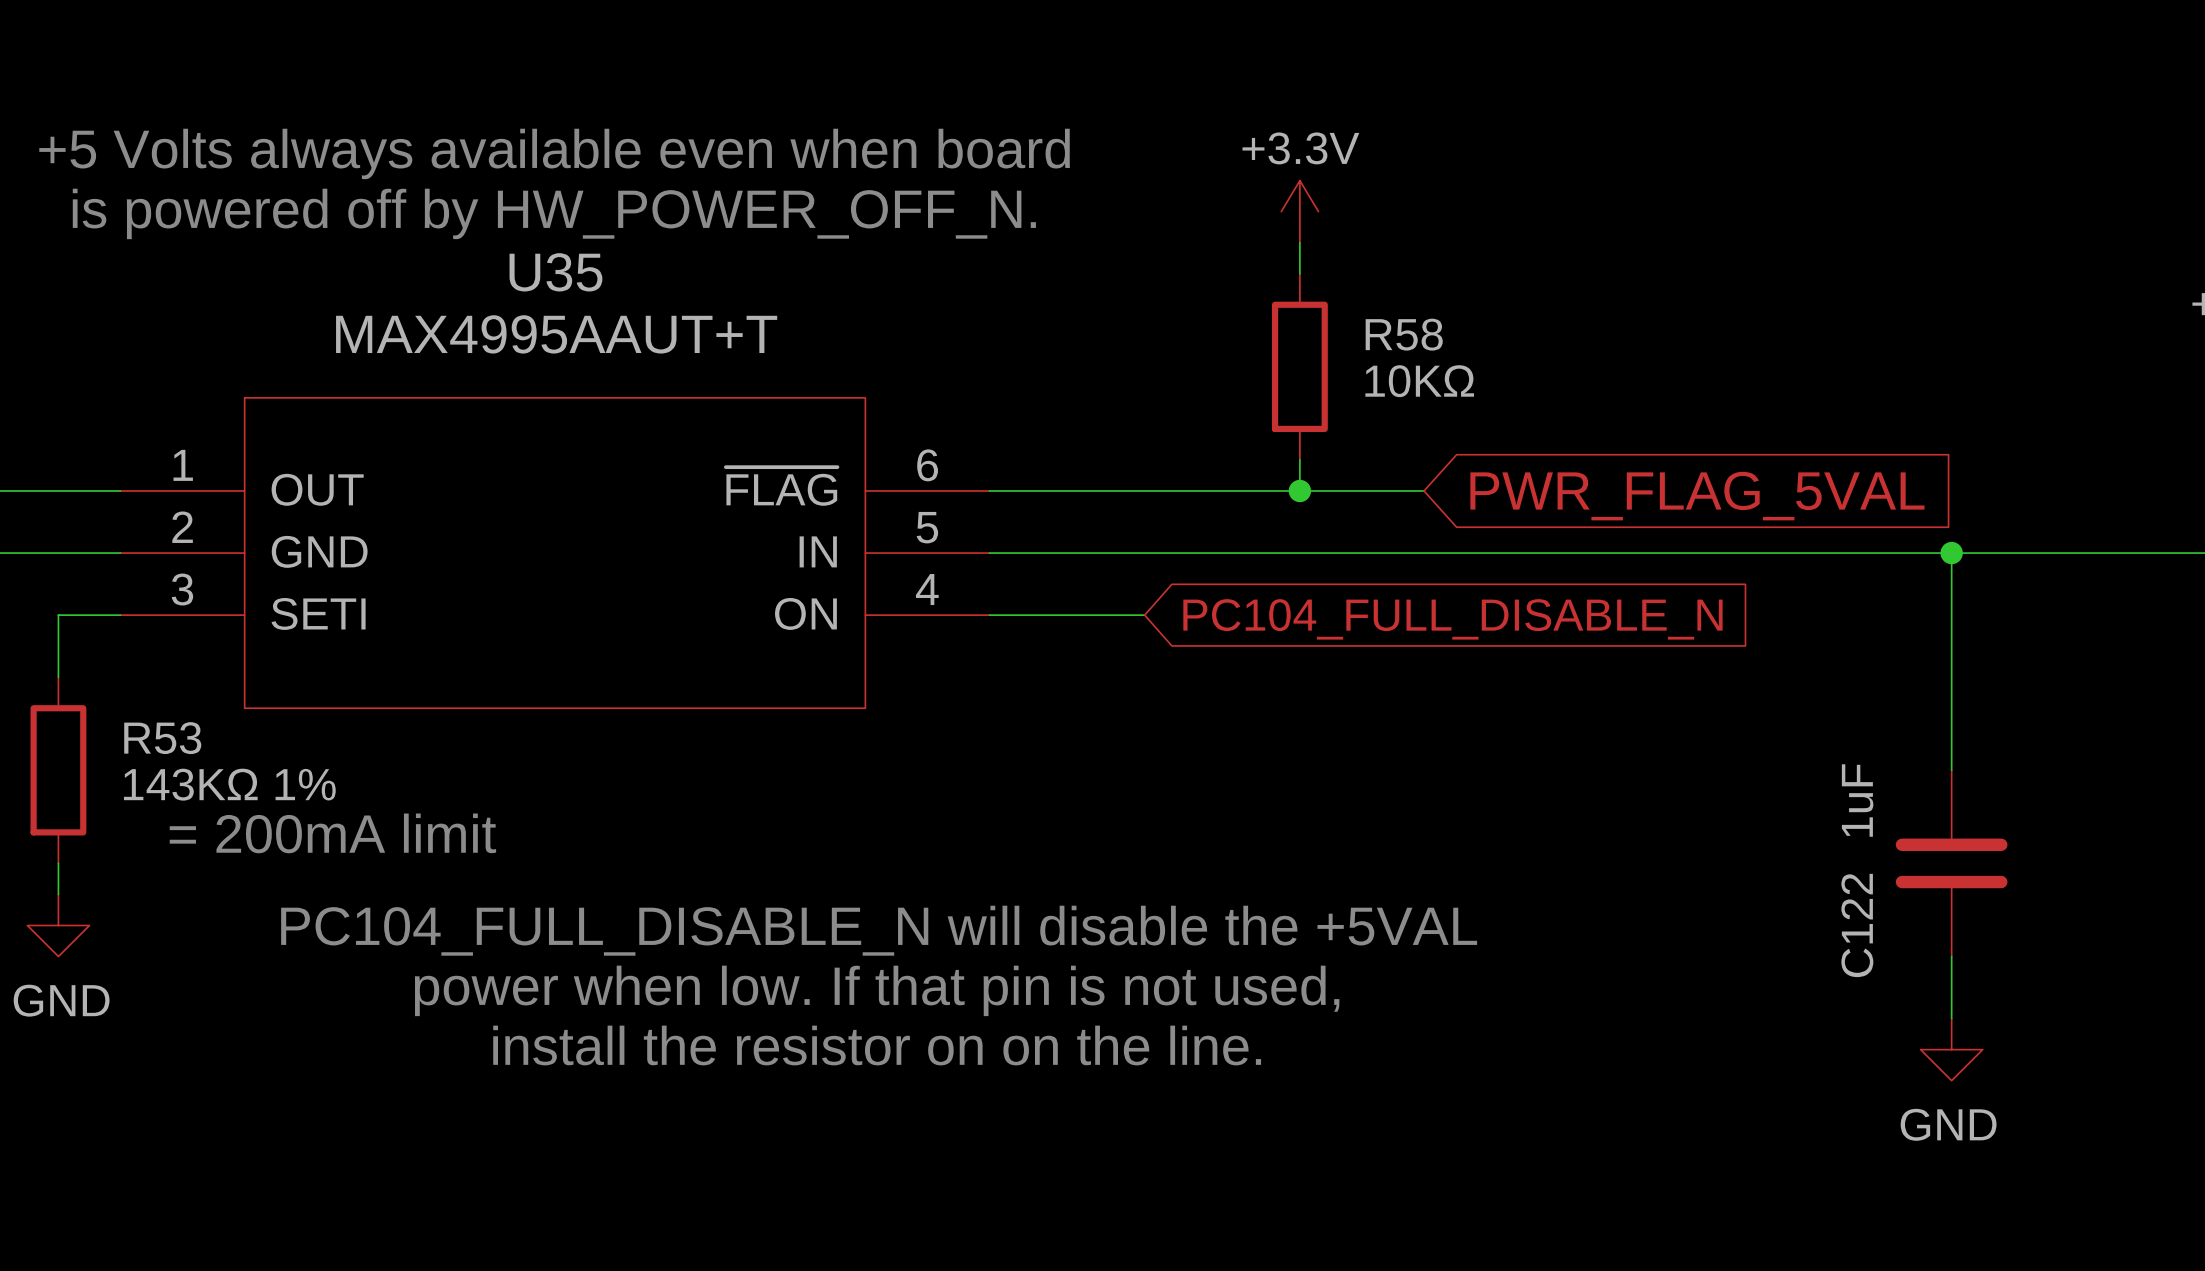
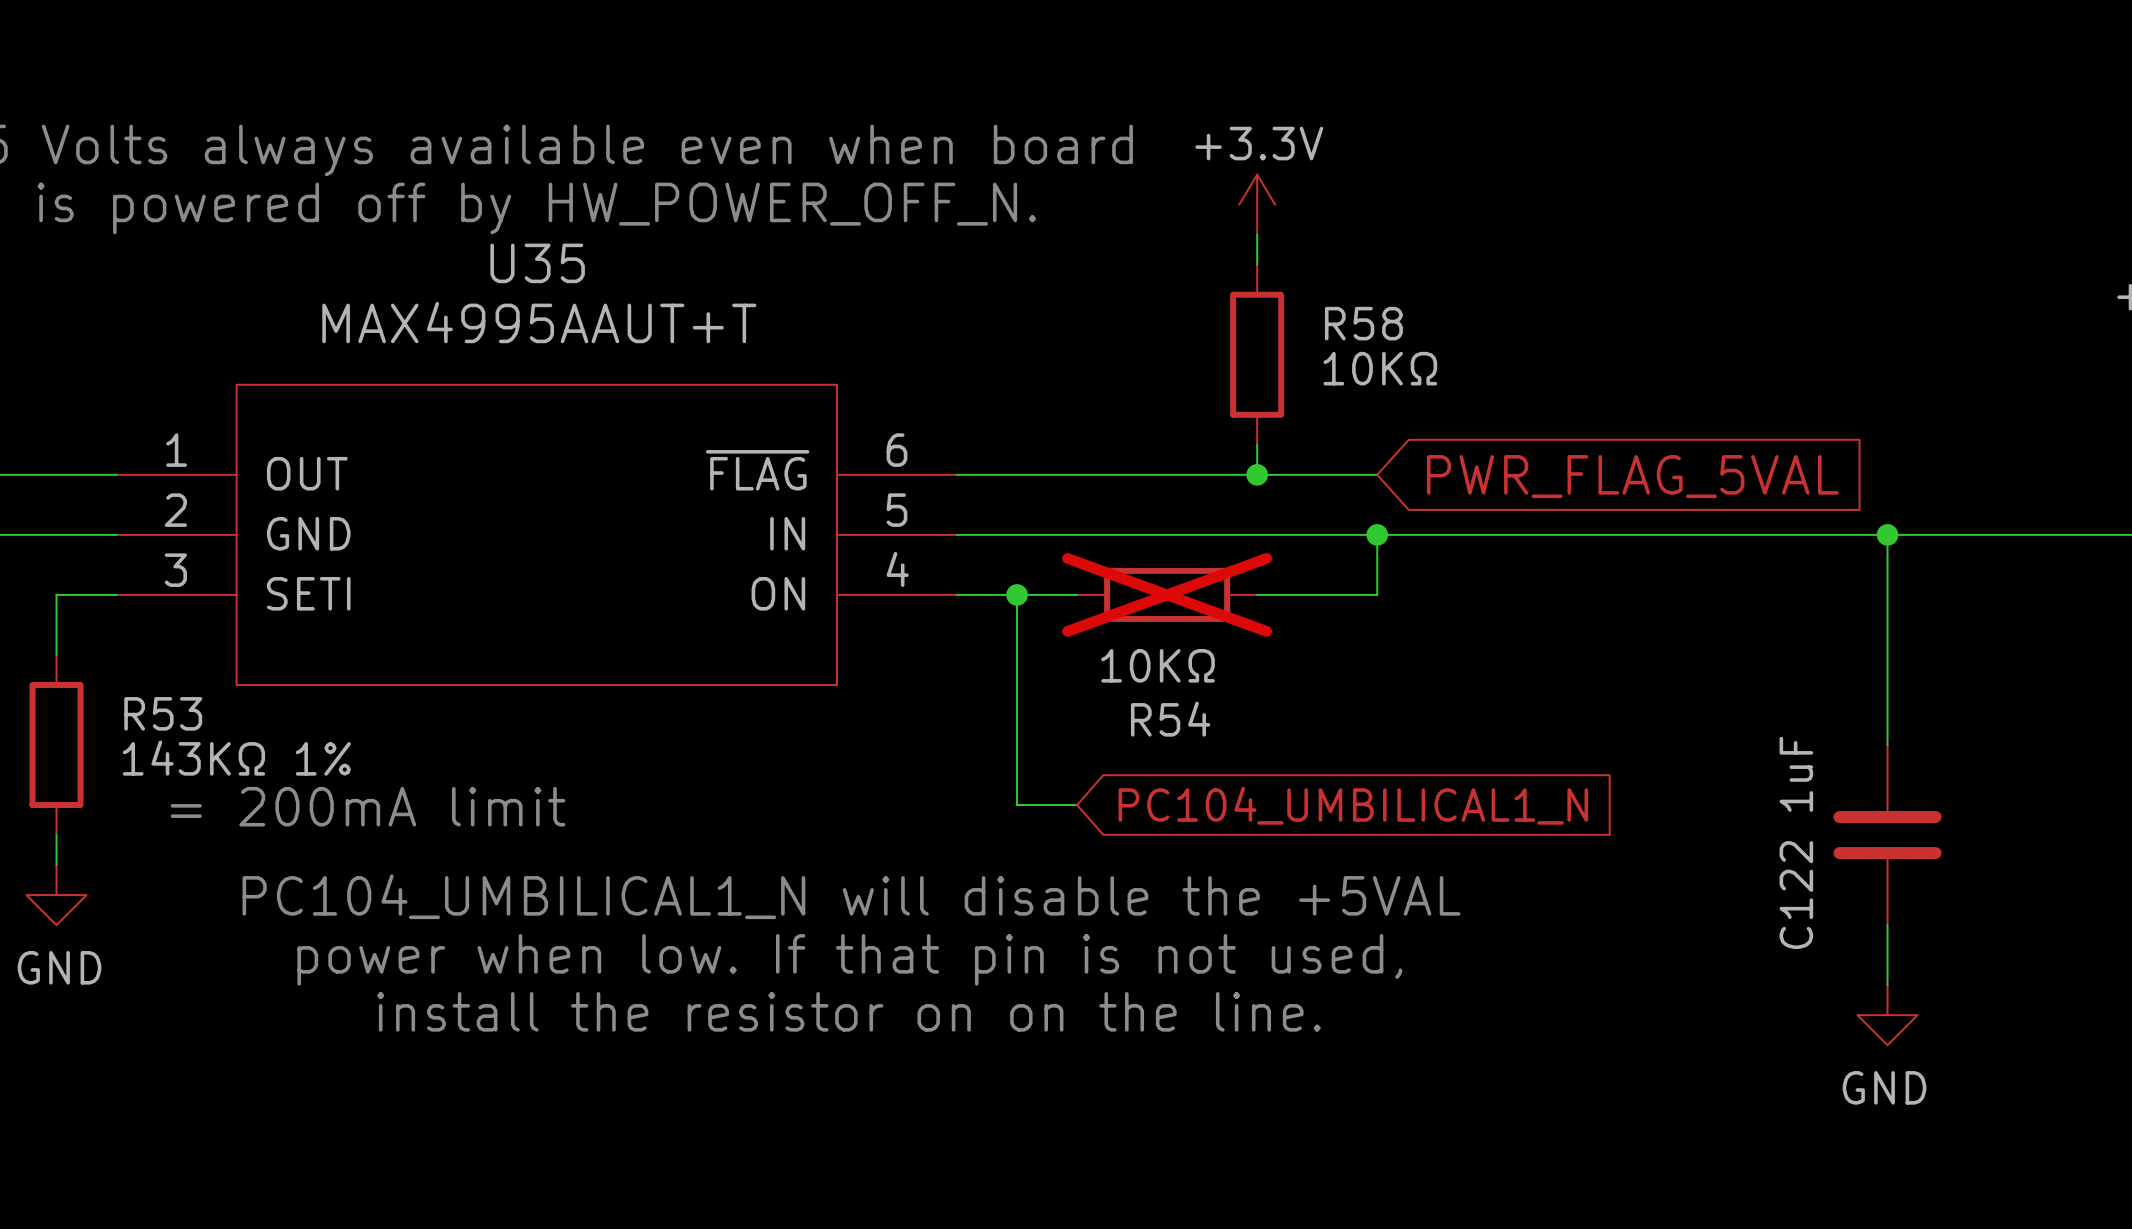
wire: none -> (1377, 534) (1377, 594) (1257, 594)
junction: none -> (1377, 534)
wire: none -> (1017, 594) (1017, 805) (1077, 805)
junction: none -> (1017, 594)
R54: none -> 10KΩ (1167, 594)
global label: PC104_FULL_DISABLE_N (1452, 619) -> none
global label: none -> PC104_UMBILICAL1_N (1353, 805)
text: PC104_FULL_DISABLE_N will disable the +5VAL (879, 930) -> PC104_UMBILICAL1_N will disable the +5VAL (851, 896)

